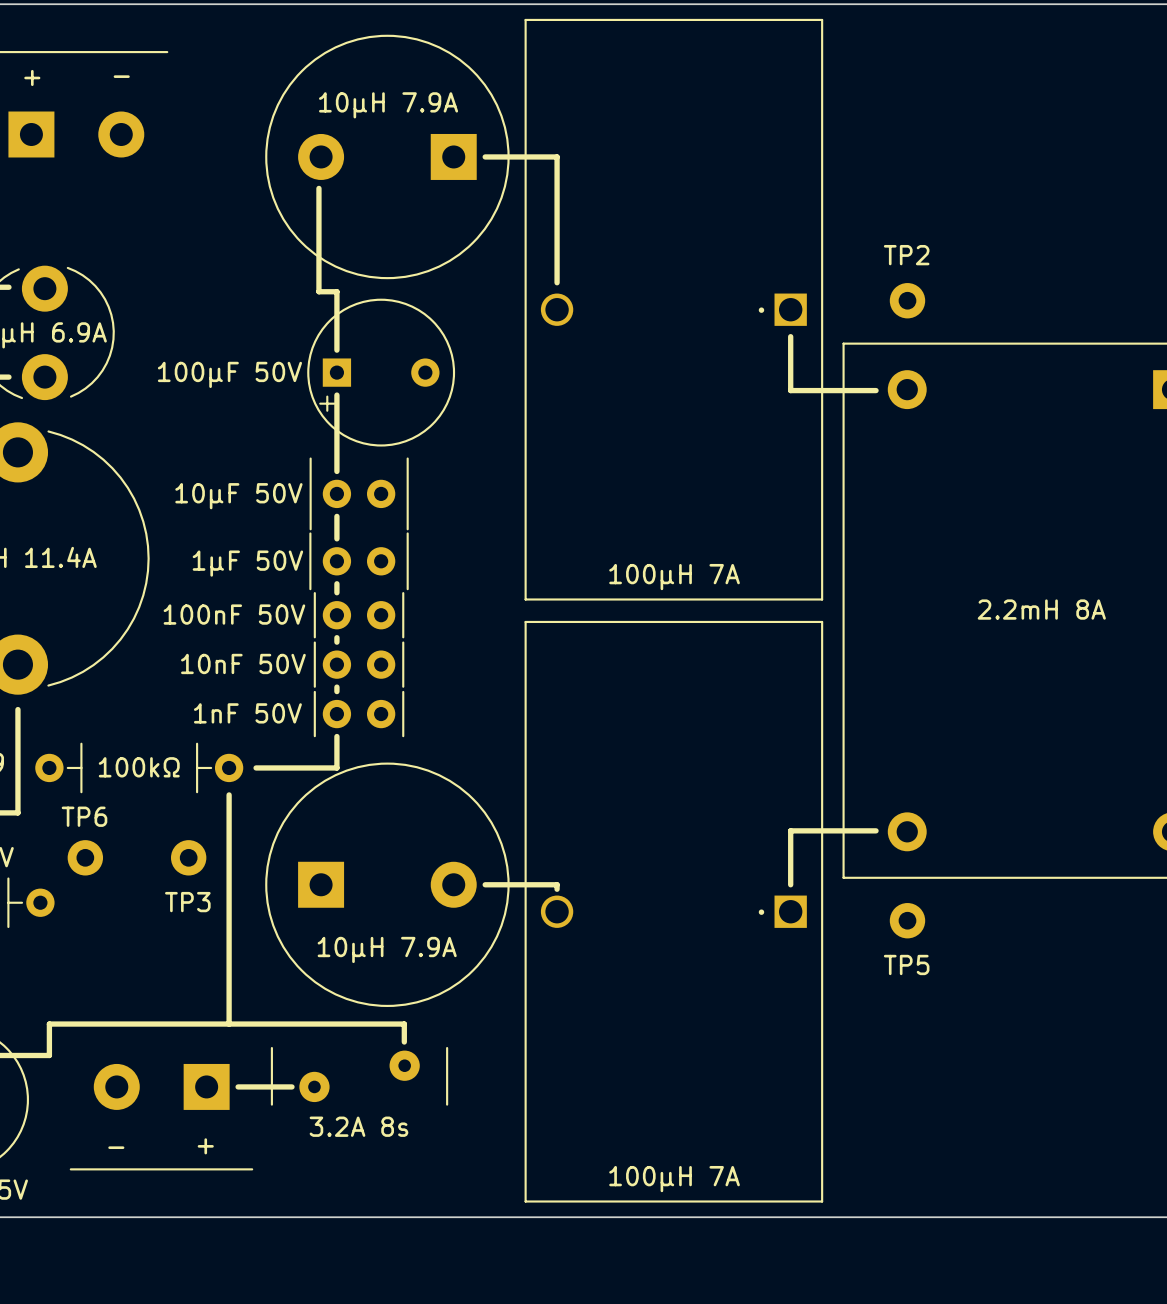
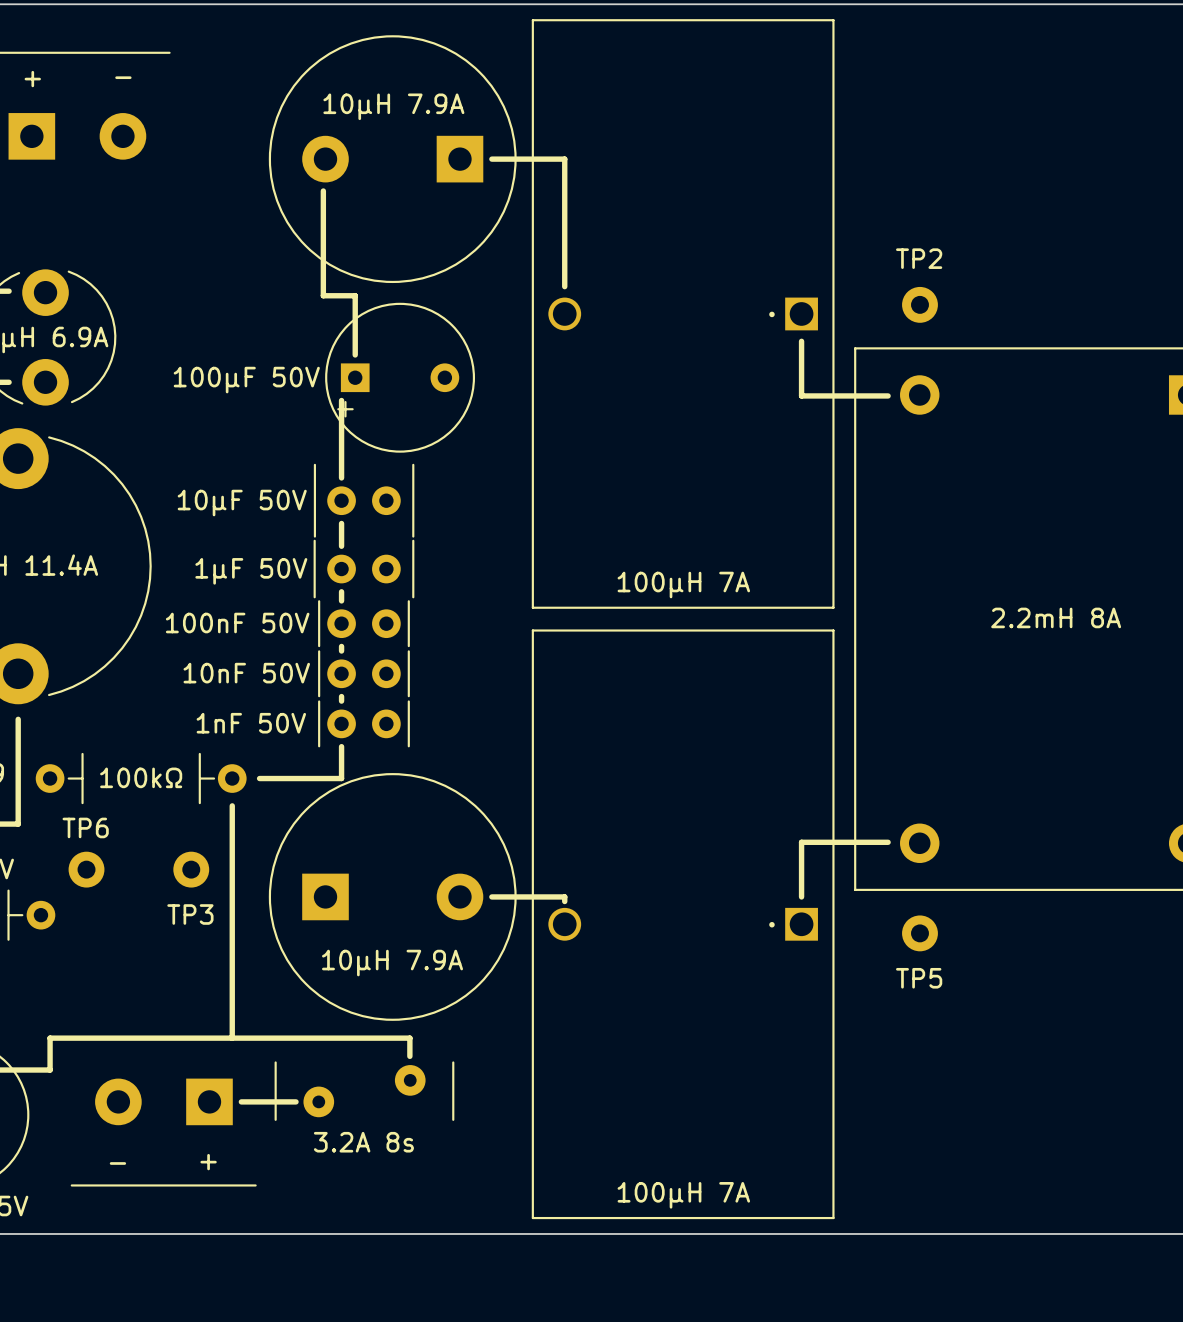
line: (336, 291) (336, 350) -> (341, 295) (355, 295) (355, 354)
part position: (381, 372) -> (400, 377)

